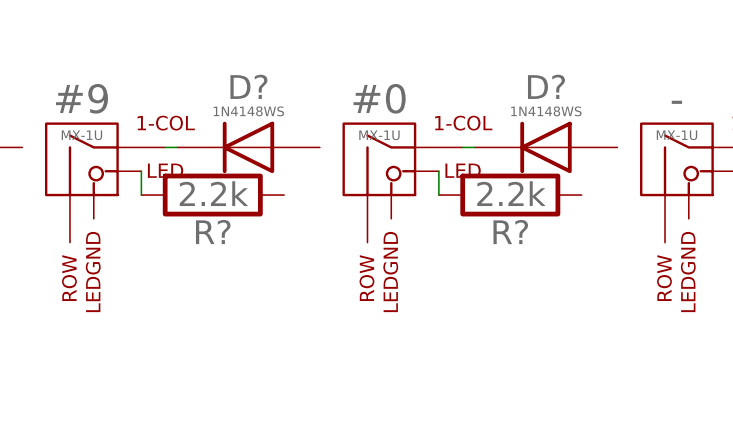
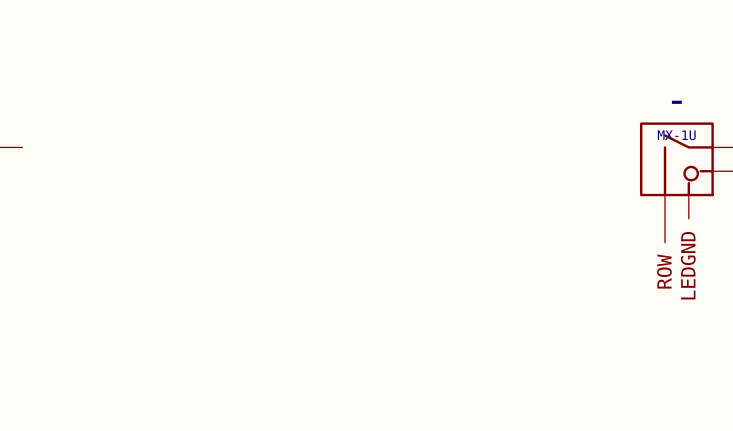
wire: (165, 147) (177, 147) -> none
D?: 1N4148WS (248, 147) -> none
wire: (462, 147) (474, 147) -> none
D?: 1N4148WS (546, 147) -> none
wire: (141, 171) (141, 195) -> none
wire: (438, 171) (438, 195) -> none
#9: MX-1U (105, 182) -> none
#0: MX-1U (402, 182) -> none
R?: 2.2k (212, 195) -> none
R?: 2.2k (510, 195) -> none

